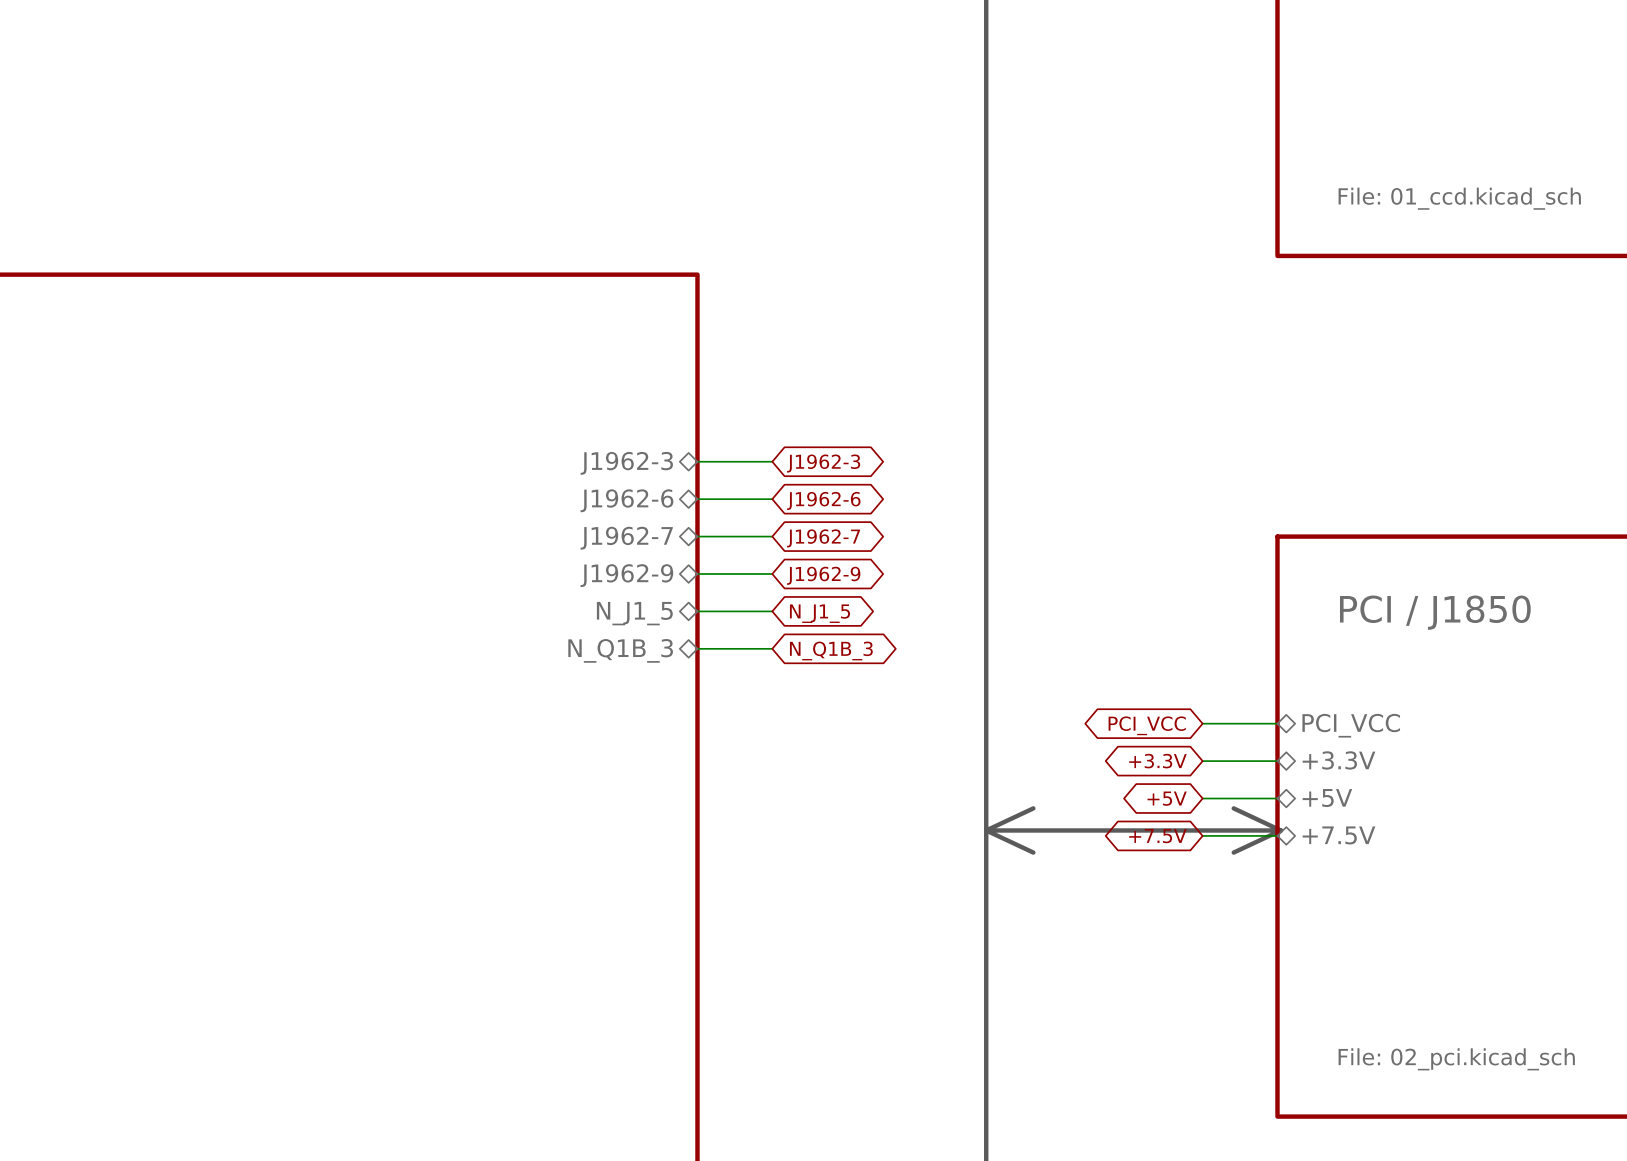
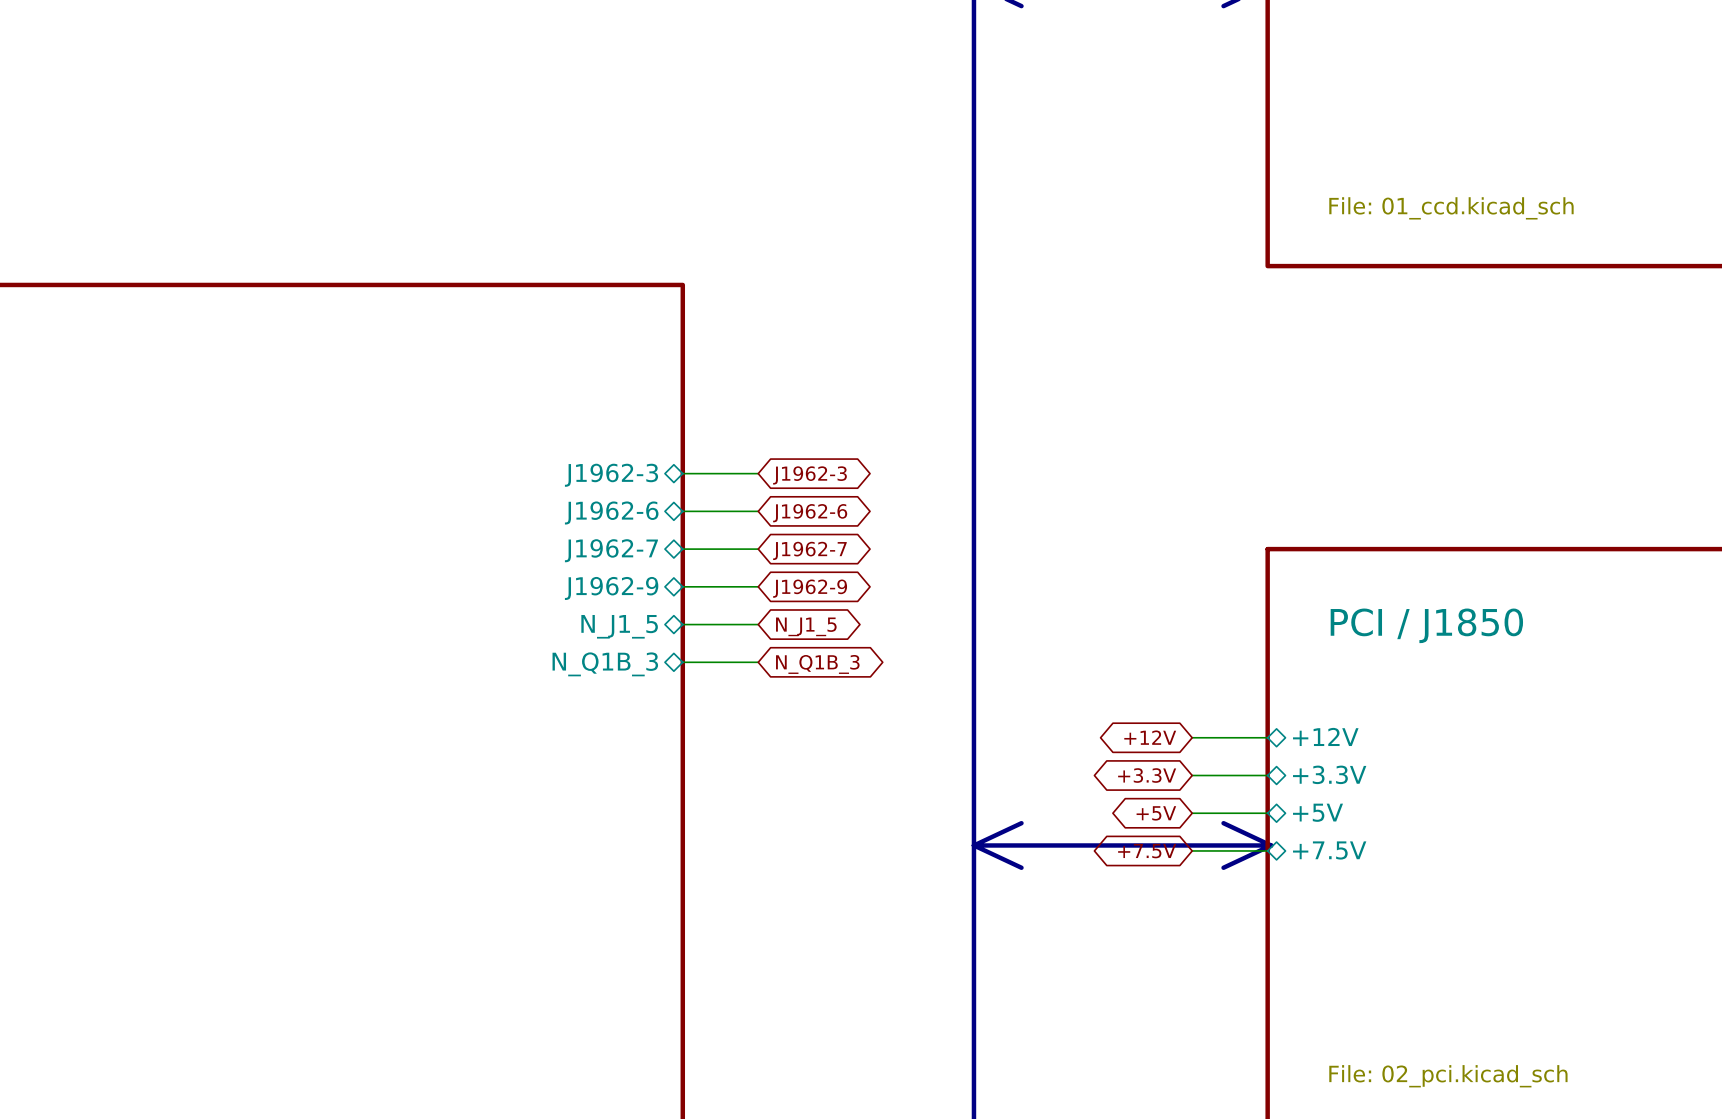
global label: PCI_VCC (1147, 725) -> +12V (1150, 737)
sheet pin: PCI_VCC (1351, 725) -> +12V (1325, 736)

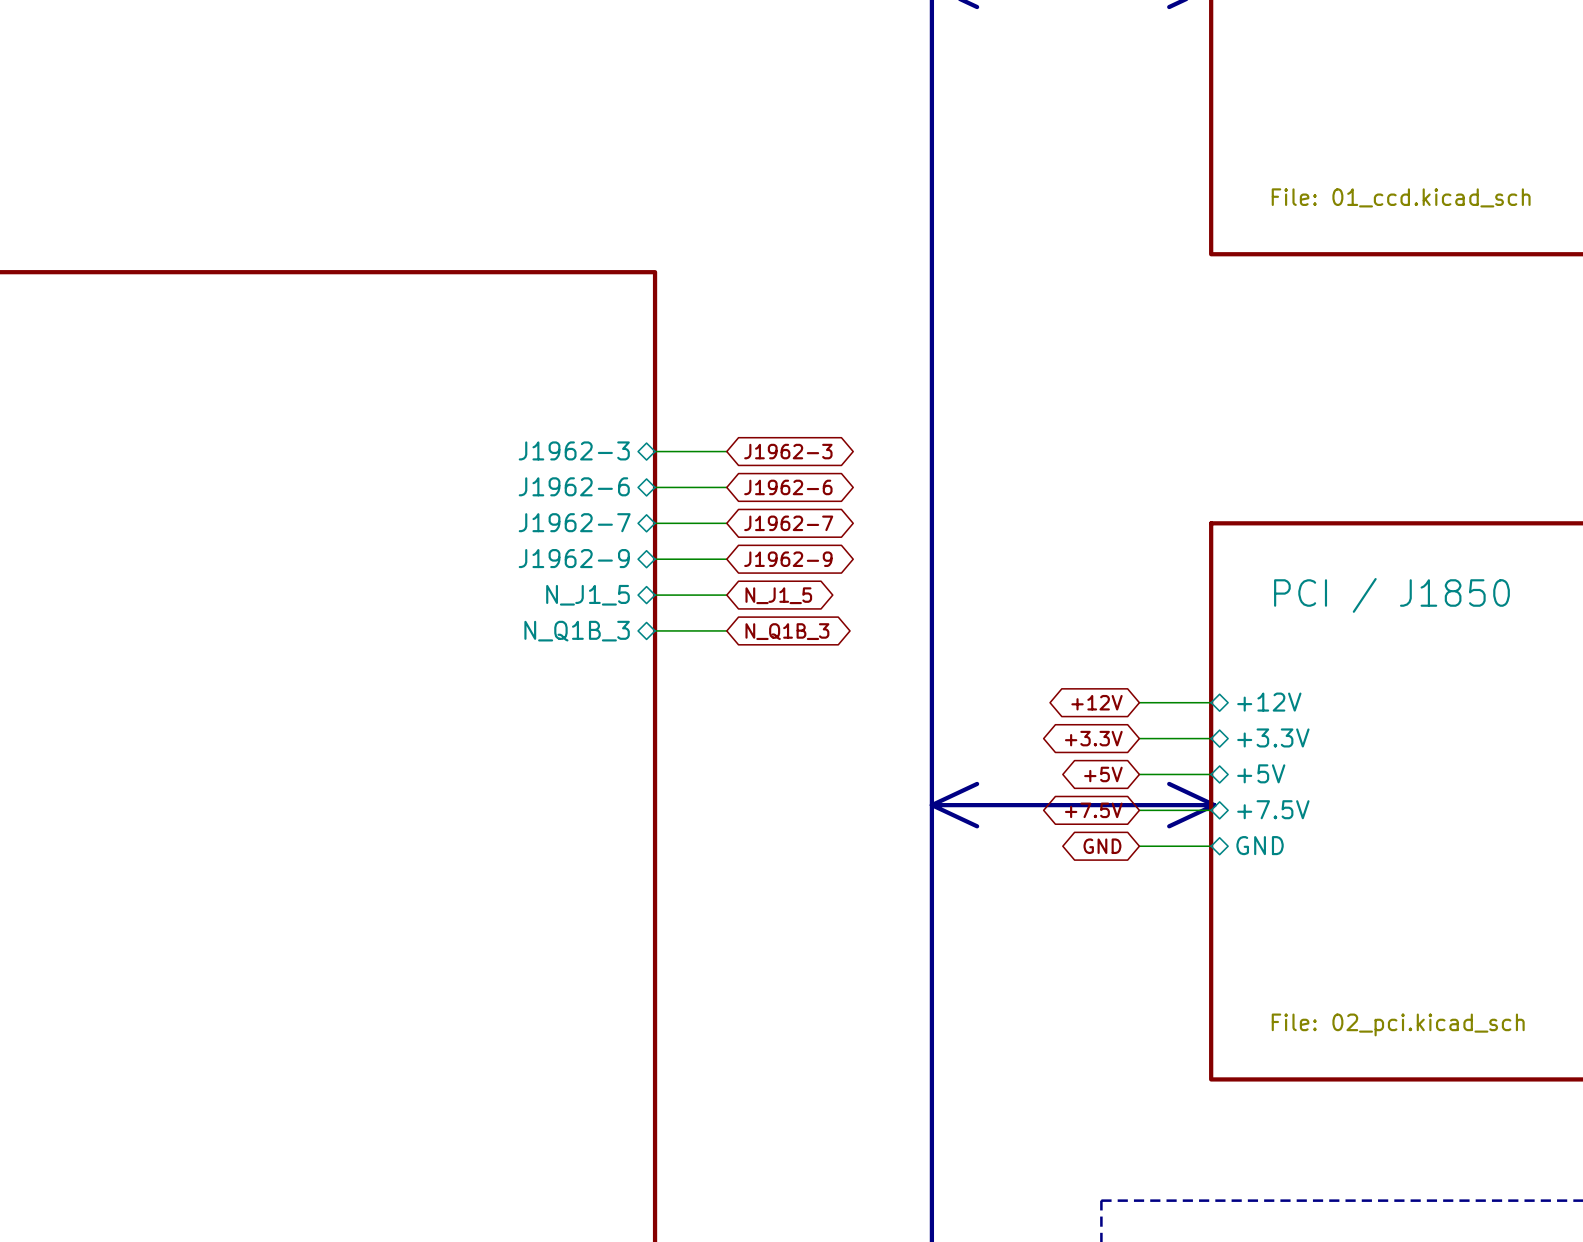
global label: none -> GND (1102, 846)
wire: none -> (1139, 846) (1211, 846)
sheet pin: none -> GND (1260, 845)

